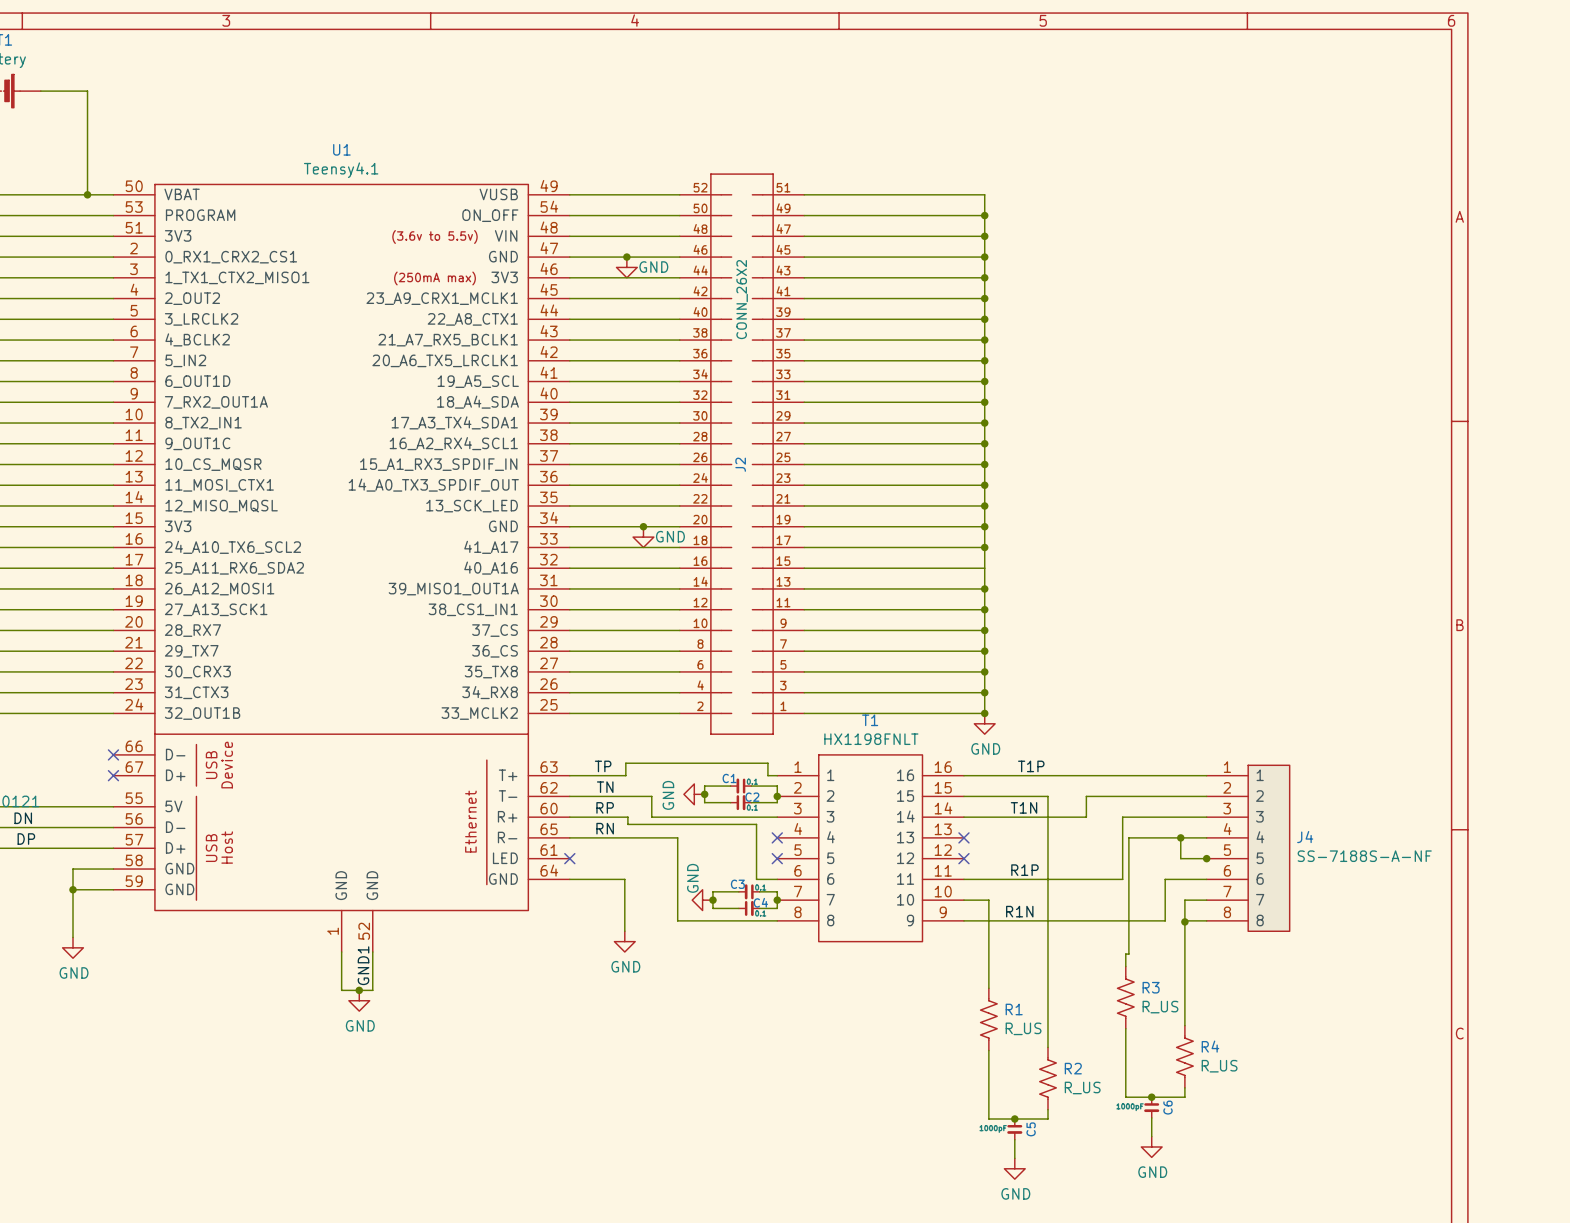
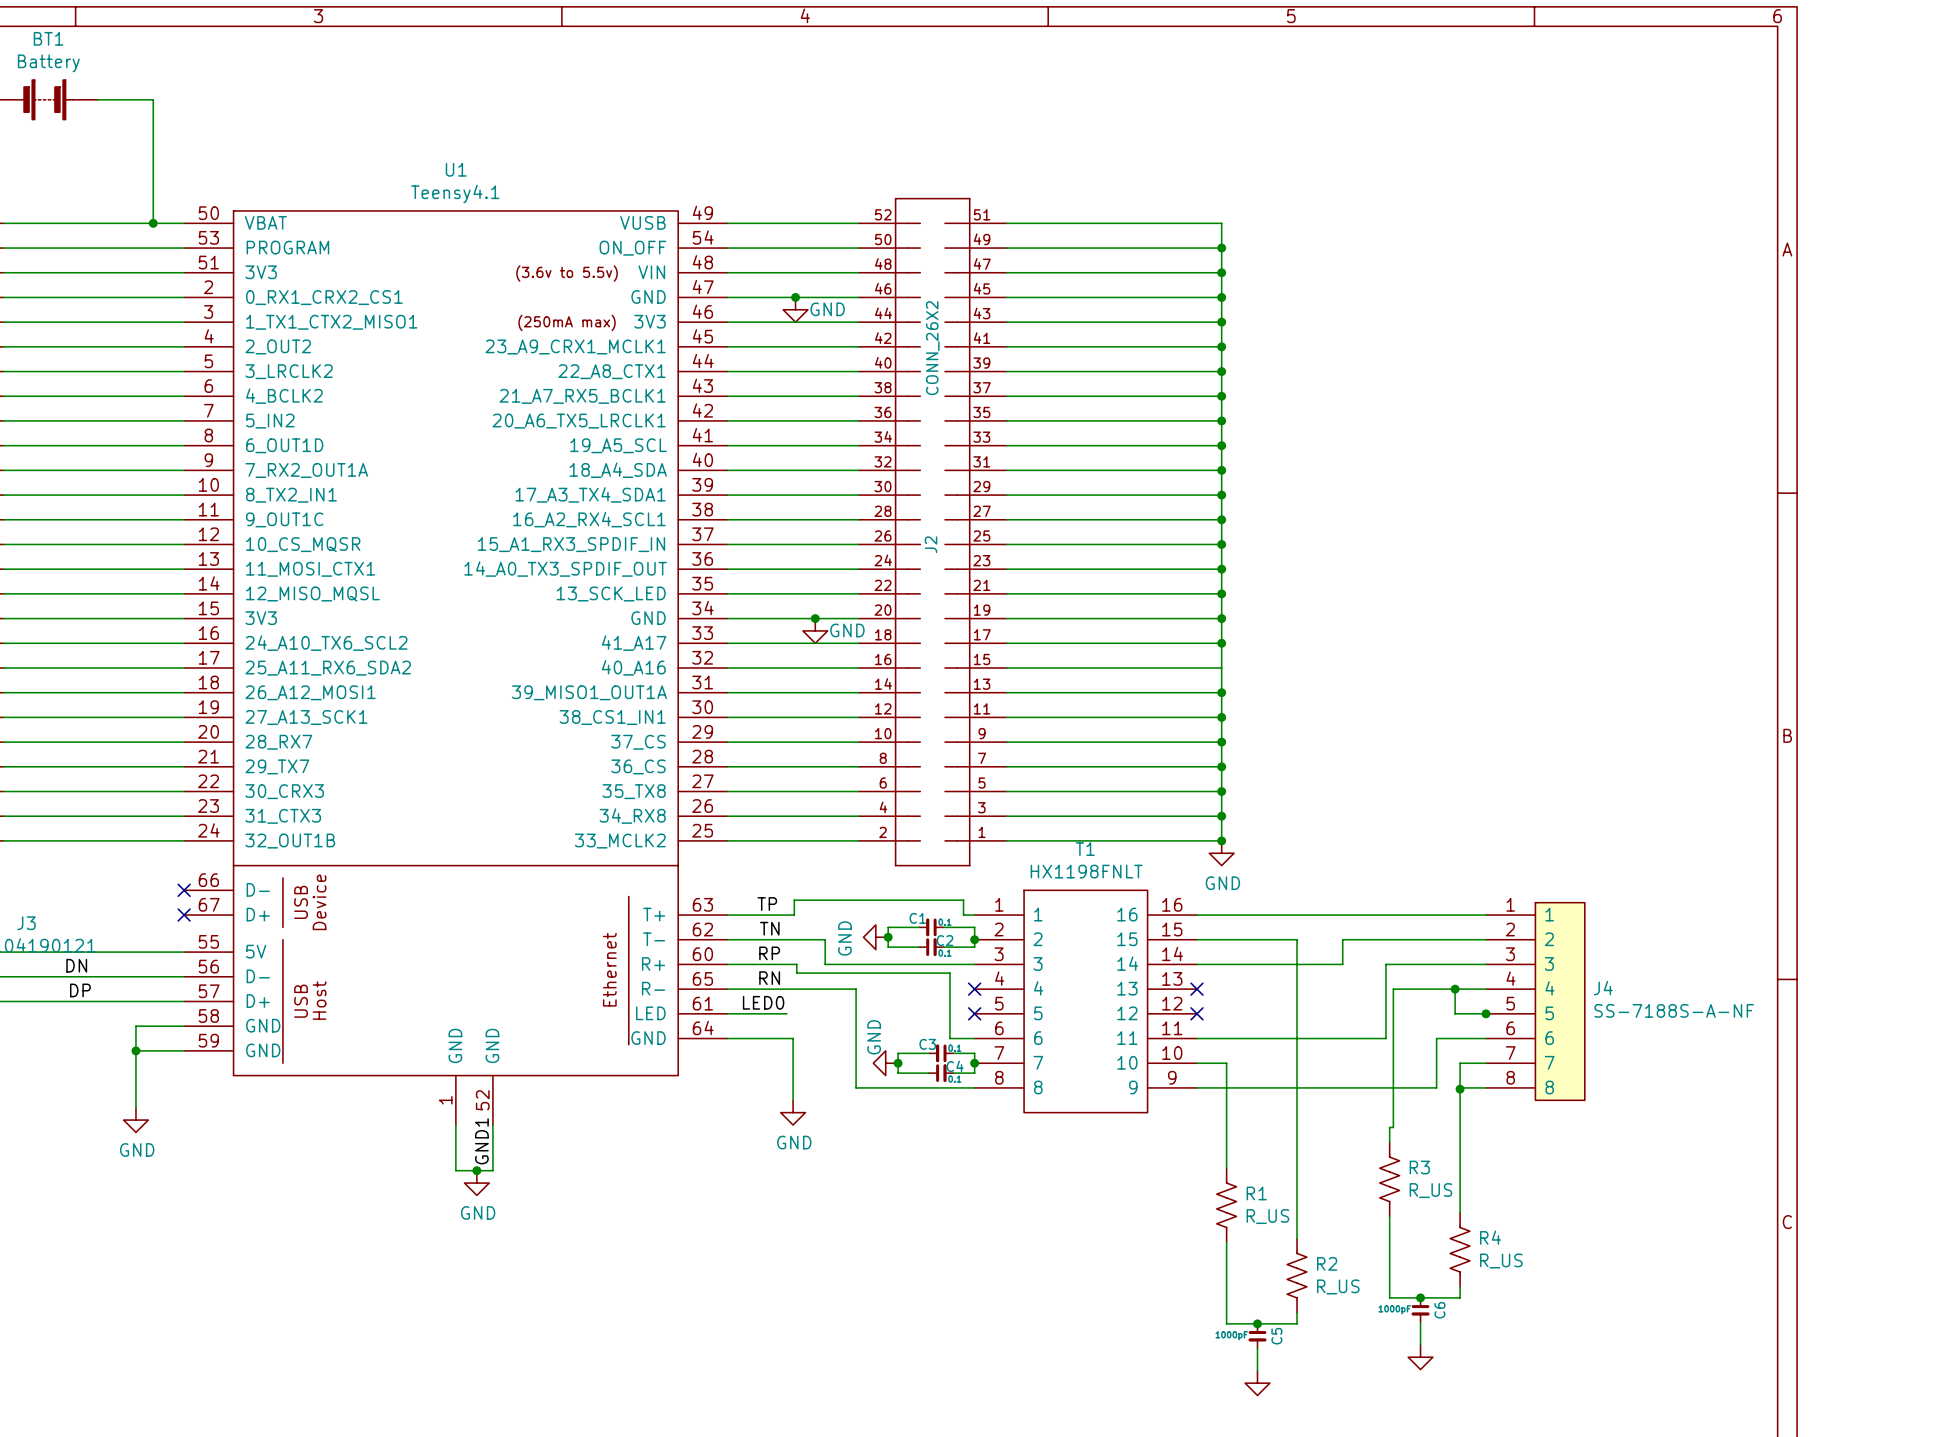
label: T1P (1031, 766) -> none
label: T1N (1024, 807) -> none
label: none -> LED0 (763, 1002)
wire: none -> (727, 1013) (786, 1013)
no-connect mark: (569, 858) -> none
label: R1P (1024, 870) -> none
label: R1N (1019, 911) -> none
power symbol text: GND (1152, 1172) -> none
power symbol text: GND (1015, 1193) -> none

